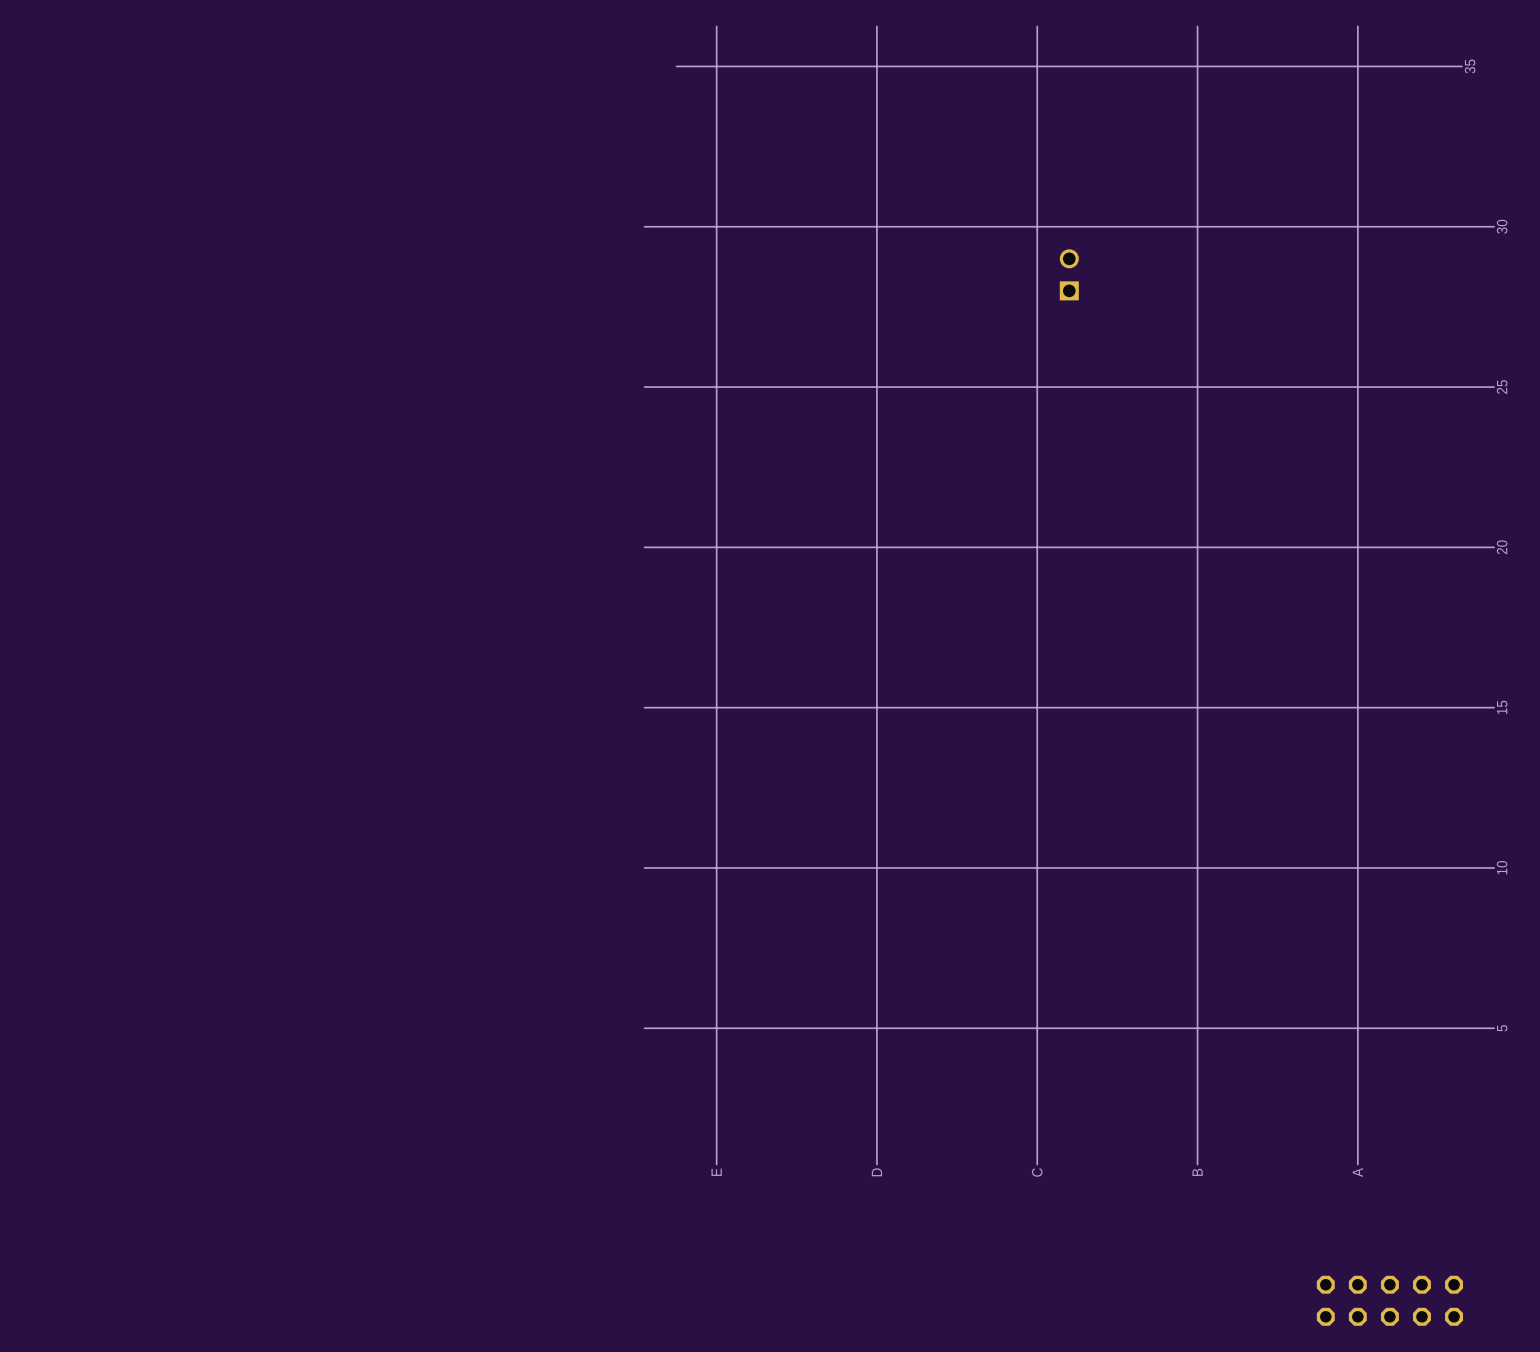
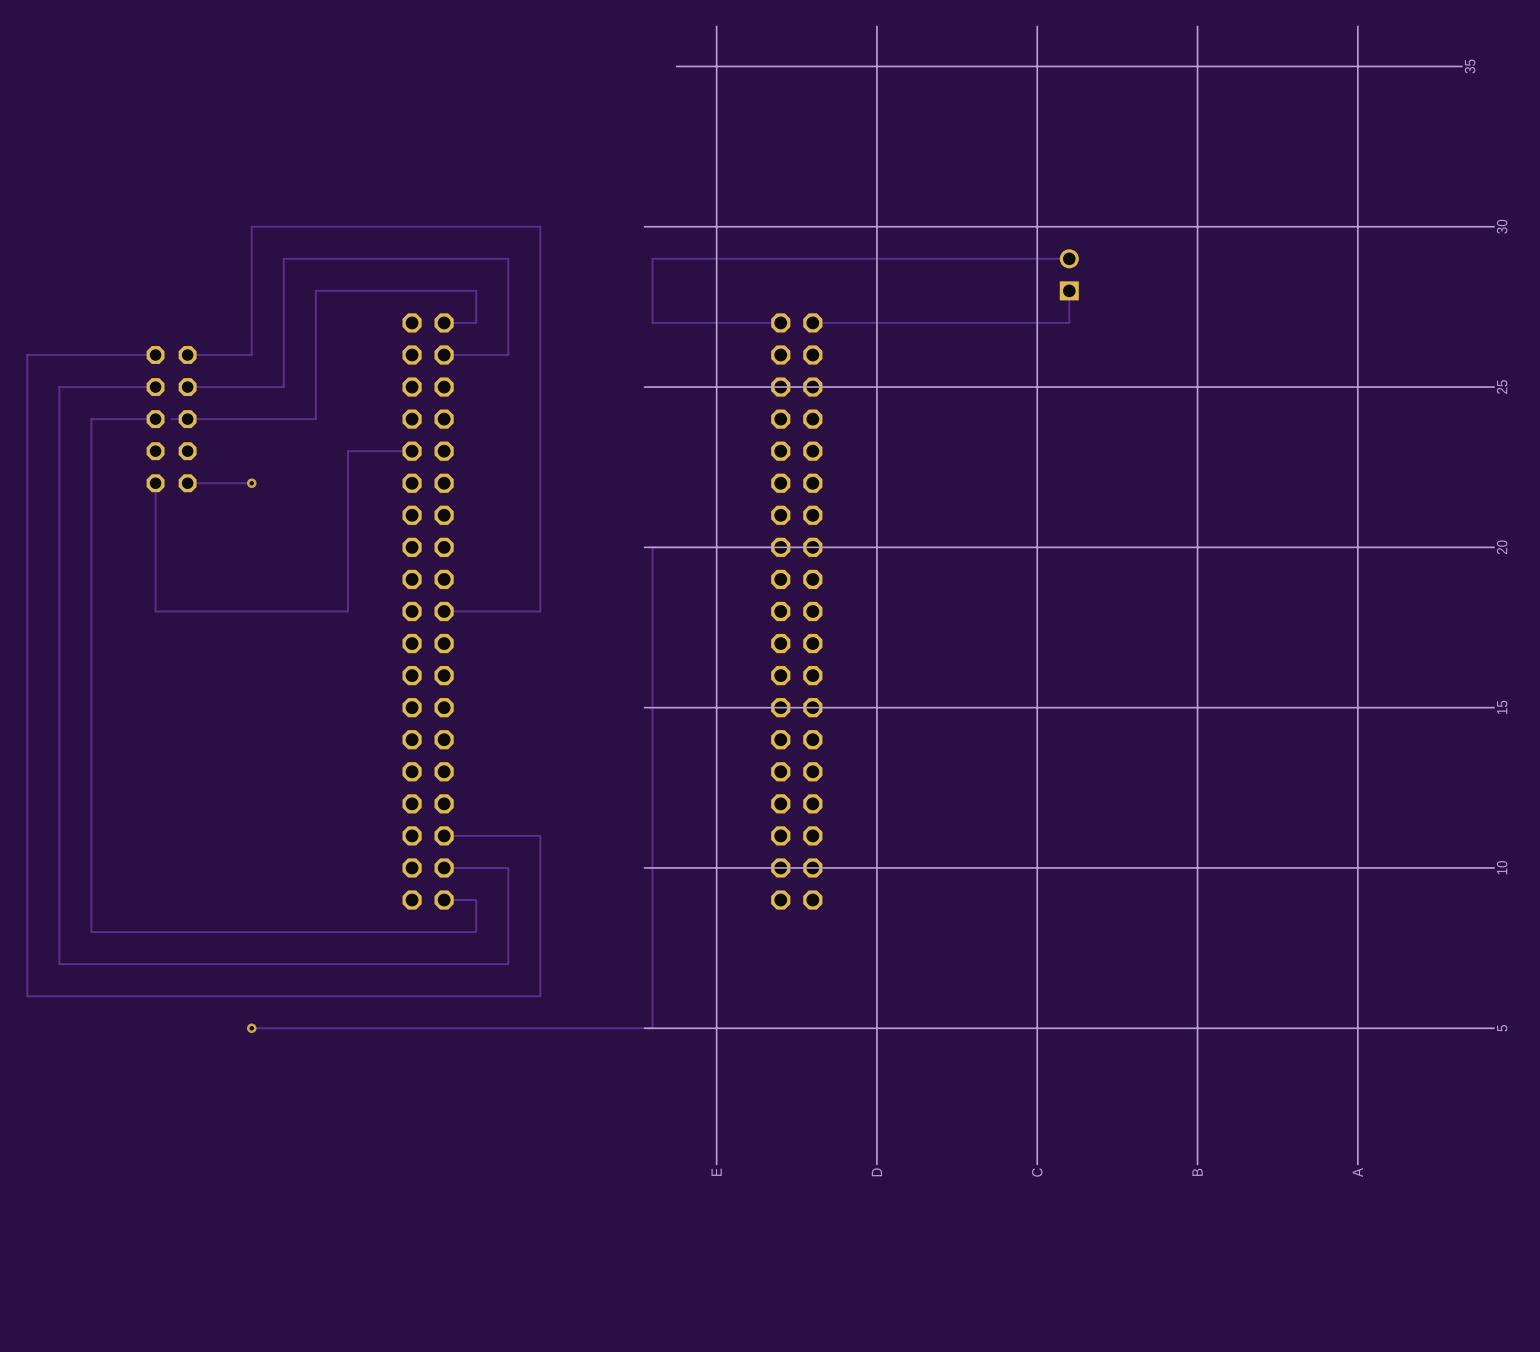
track: none -> (1069, 258) (652, 258) (652, 322) (780, 322)
track: none -> (1069, 290) (1069, 322) (812, 322)
track: none -> (444, 322) (476, 322) (476, 290) (315, 290) (315, 419) (171, 419)
track: none -> (155, 354) (27, 354) (27, 996) (540, 996) (540, 835) (444, 835)
track: none -> (187, 354) (251, 354) (251, 226) (540, 226) (540, 611) (444, 611)
track: none -> (444, 354) (508, 354) (508, 258) (283, 258) (283, 387) (187, 387)
track: none -> (155, 387) (59, 387) (59, 964) (508, 964) (508, 867) (444, 867)
track: none -> (155, 419) (91, 419) (91, 932) (476, 932) (476, 900) (444, 900)
part: none -> (171, 419)
track: none -> (412, 451) (347, 451) (347, 611) (155, 611) (155, 483)
track: none -> (251, 483) (187, 483)
via: none -> (251, 483)
track: none -> (780, 547) (652, 547) (652, 1028) (251, 1028)
part: none -> (428, 611)
part: none -> (796, 611)
via: none -> (251, 1028)
part: (1389, 1300) -> none

